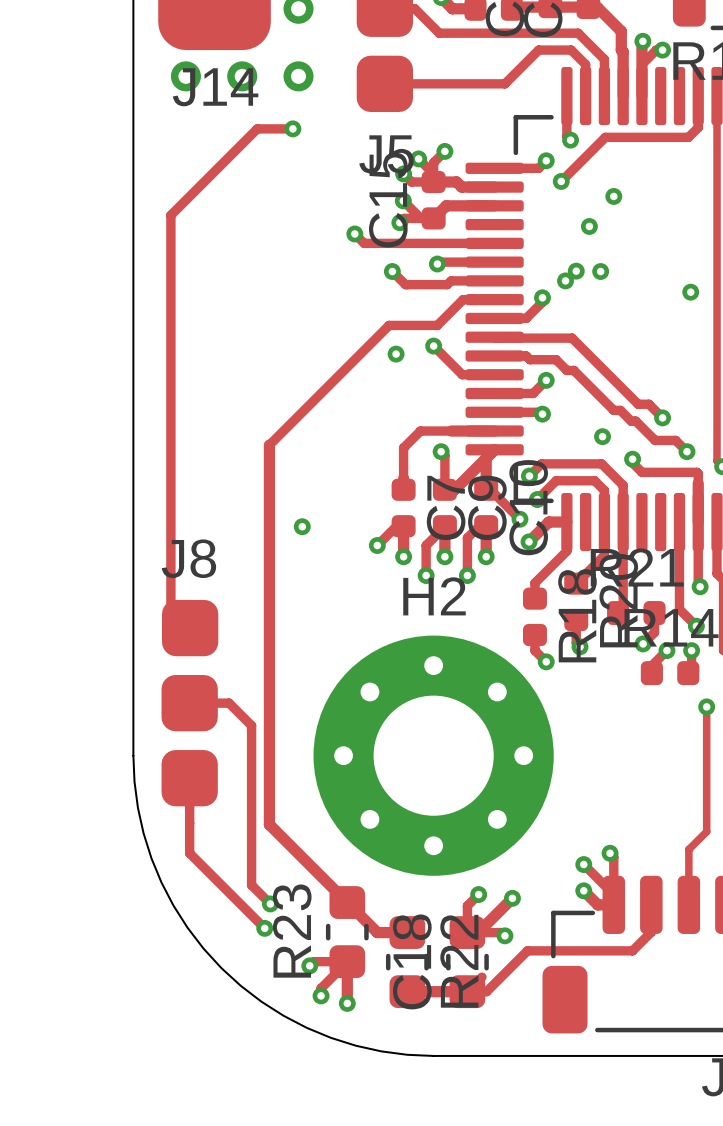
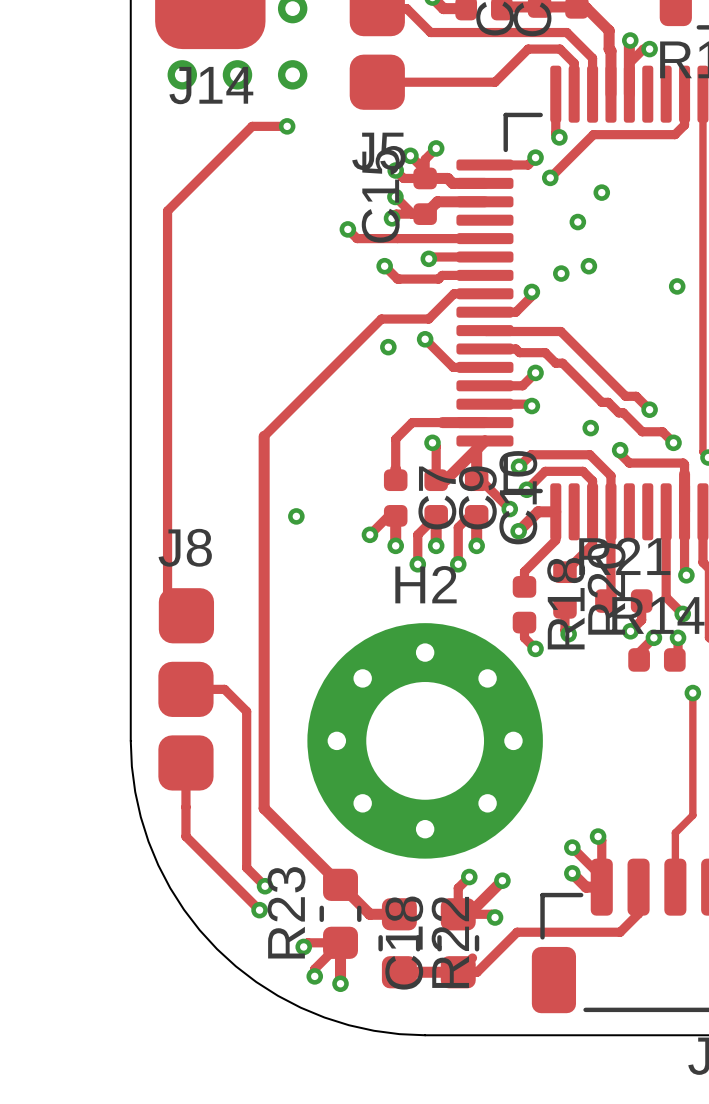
via: (576, 271) -> none
via: none -> (561, 273)
via: (565, 280) -> none

